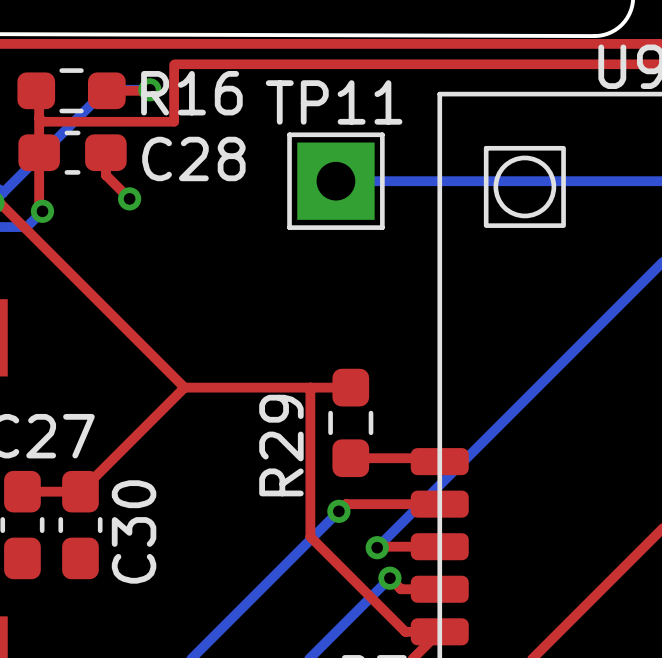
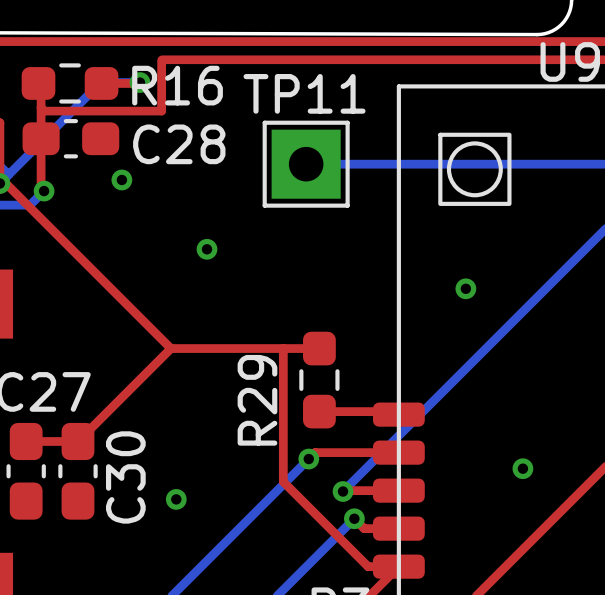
top track: (105, 152) (105, 175) (129, 198) -> none
via: none -> (207, 249)
via: none -> (465, 288)
via: none -> (522, 468)
via: none -> (176, 499)

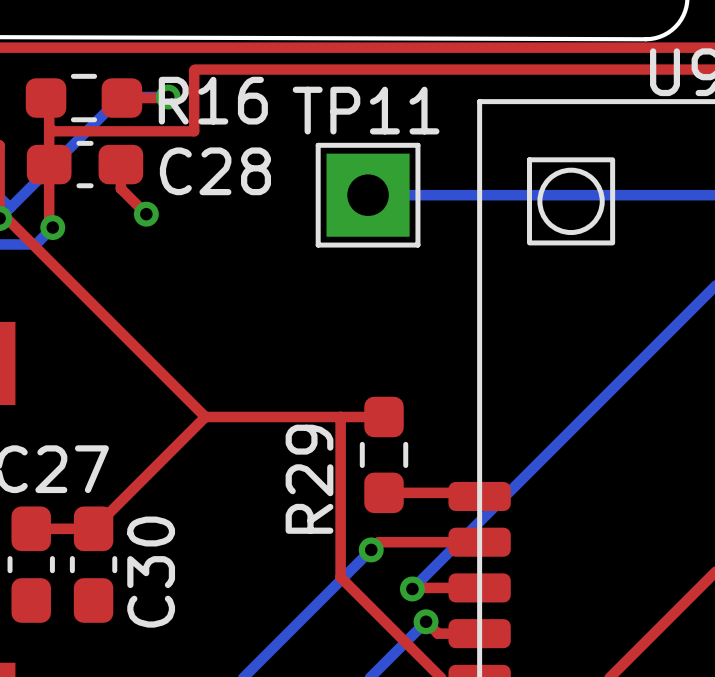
top track: none -> (120, 164) (120, 188) (146, 214)
via: (207, 249) -> none
via: (465, 288) -> none
via: (522, 468) -> none
via: (176, 499) -> none

